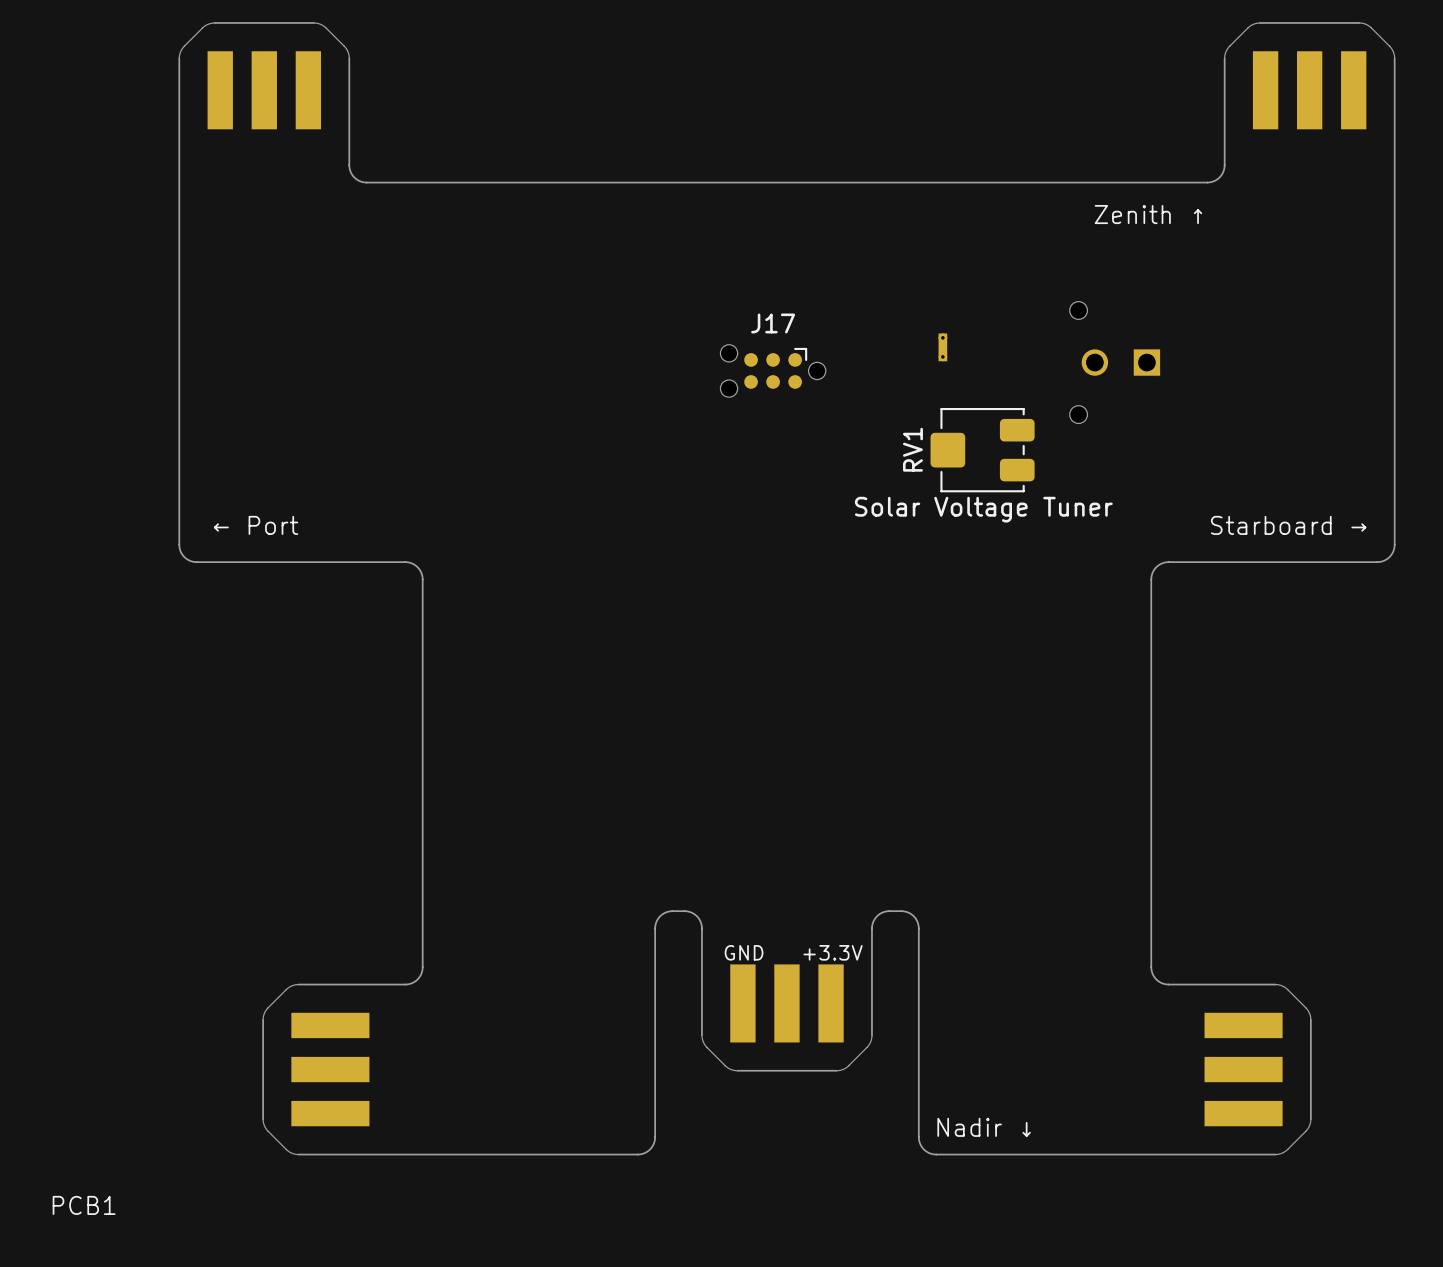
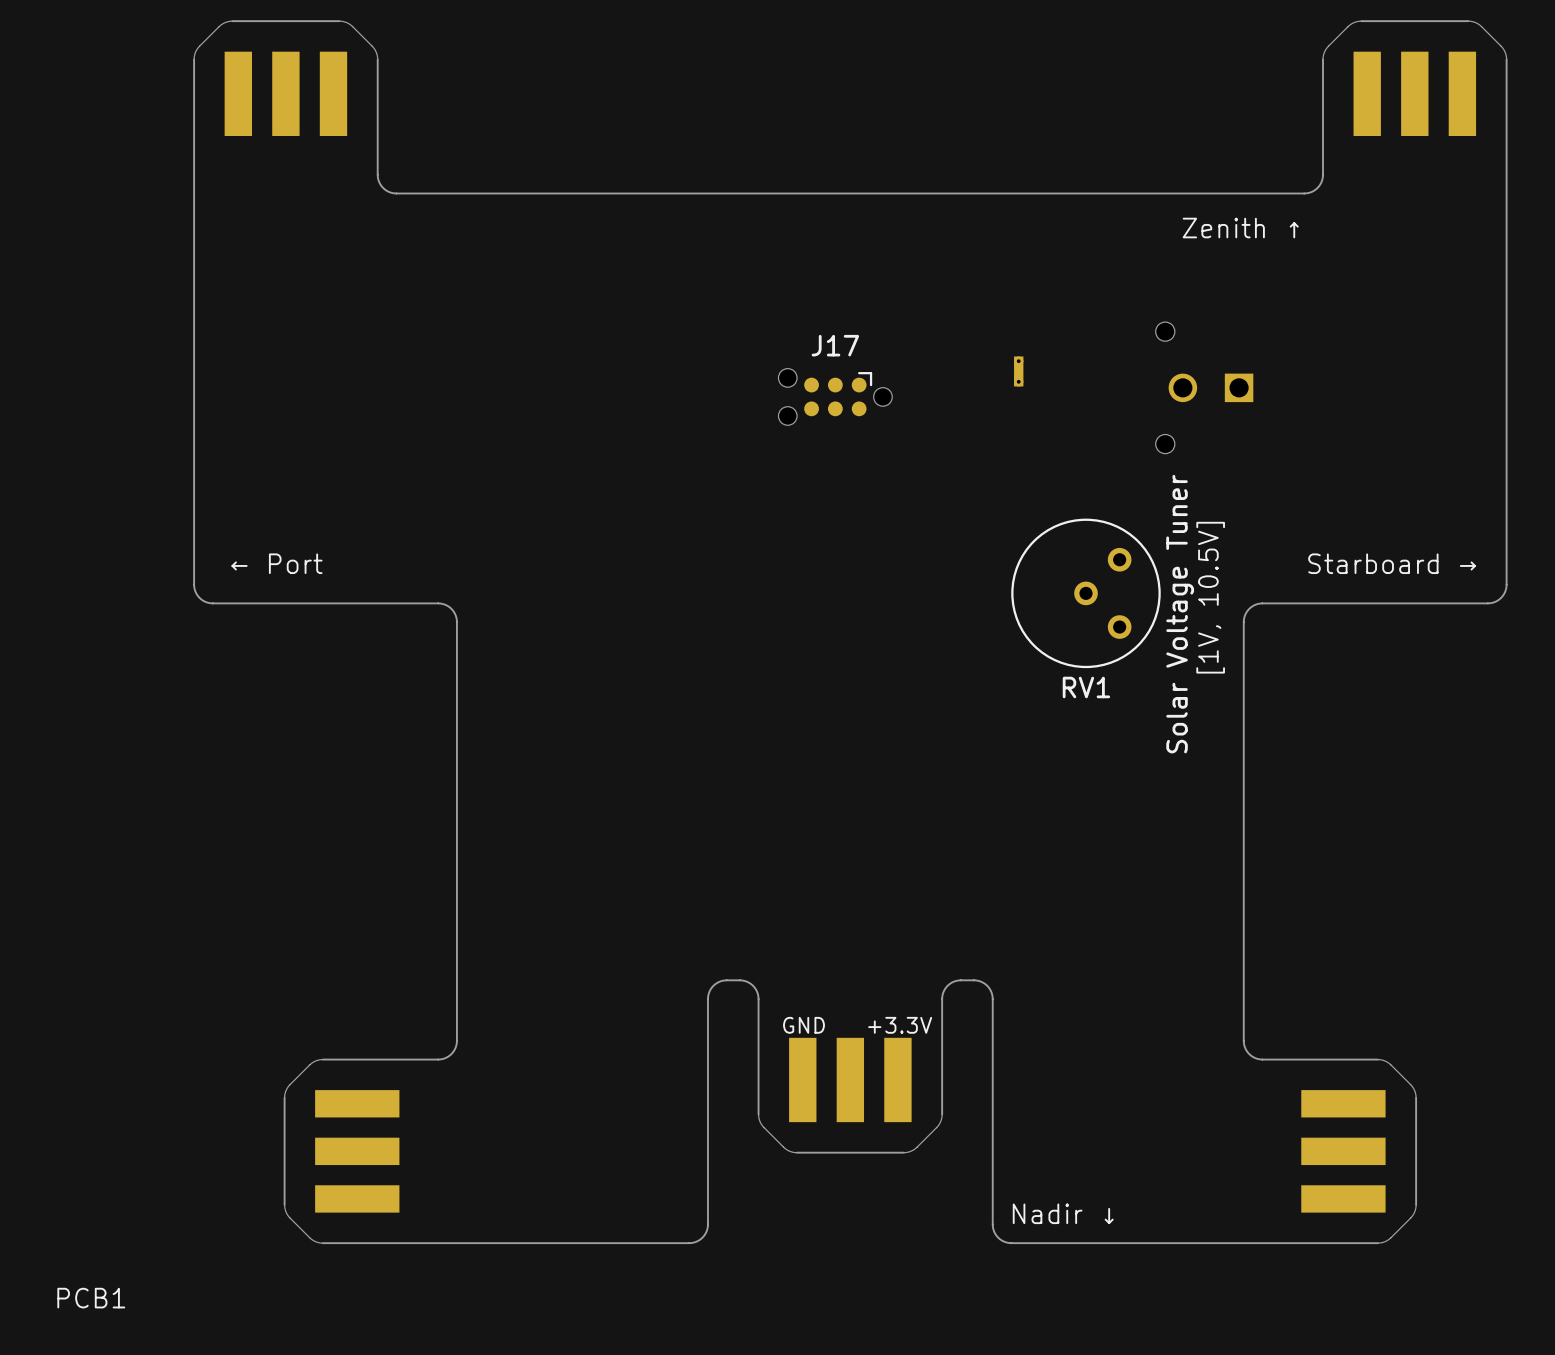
RV1 footprint: [930, 408, 1035, 493] -> [1011, 518, 1161, 669]
RV1 name position: RV1 (912, 449) -> RV1 (1086, 687)

